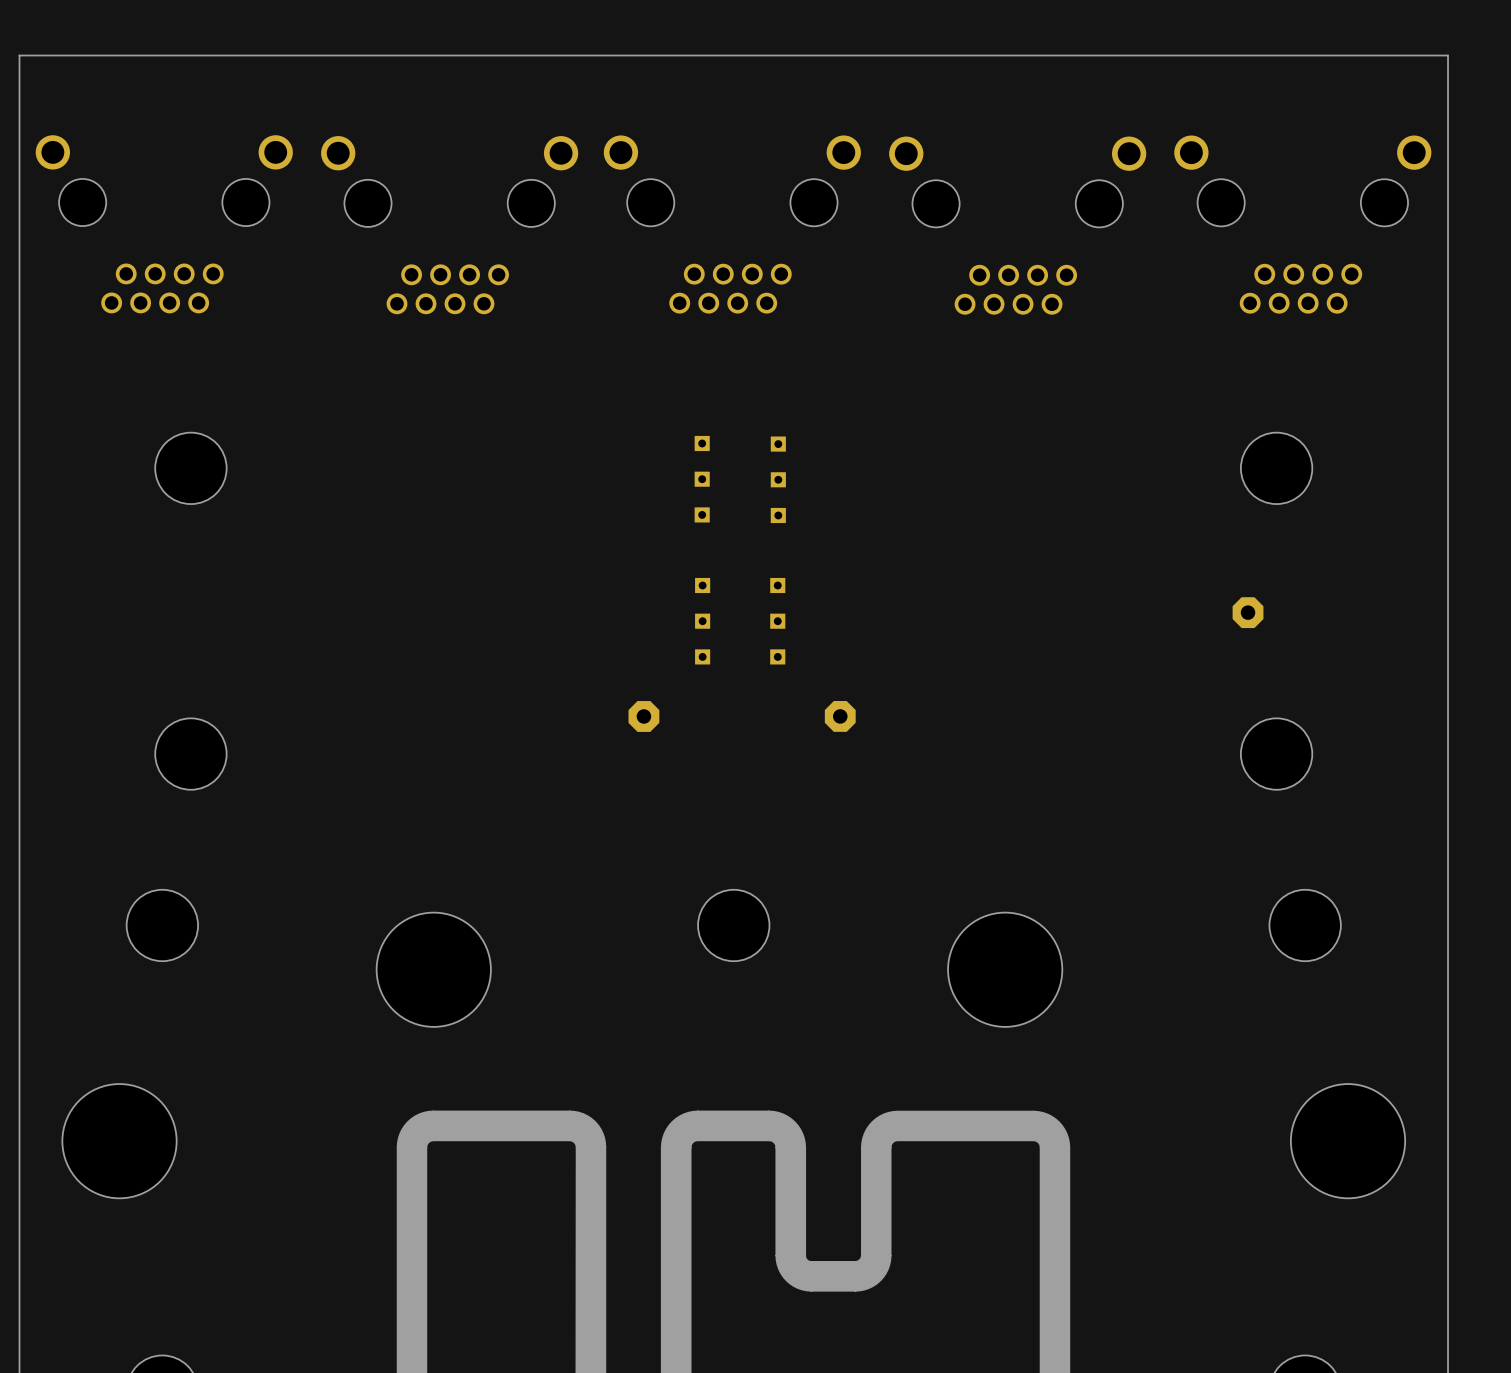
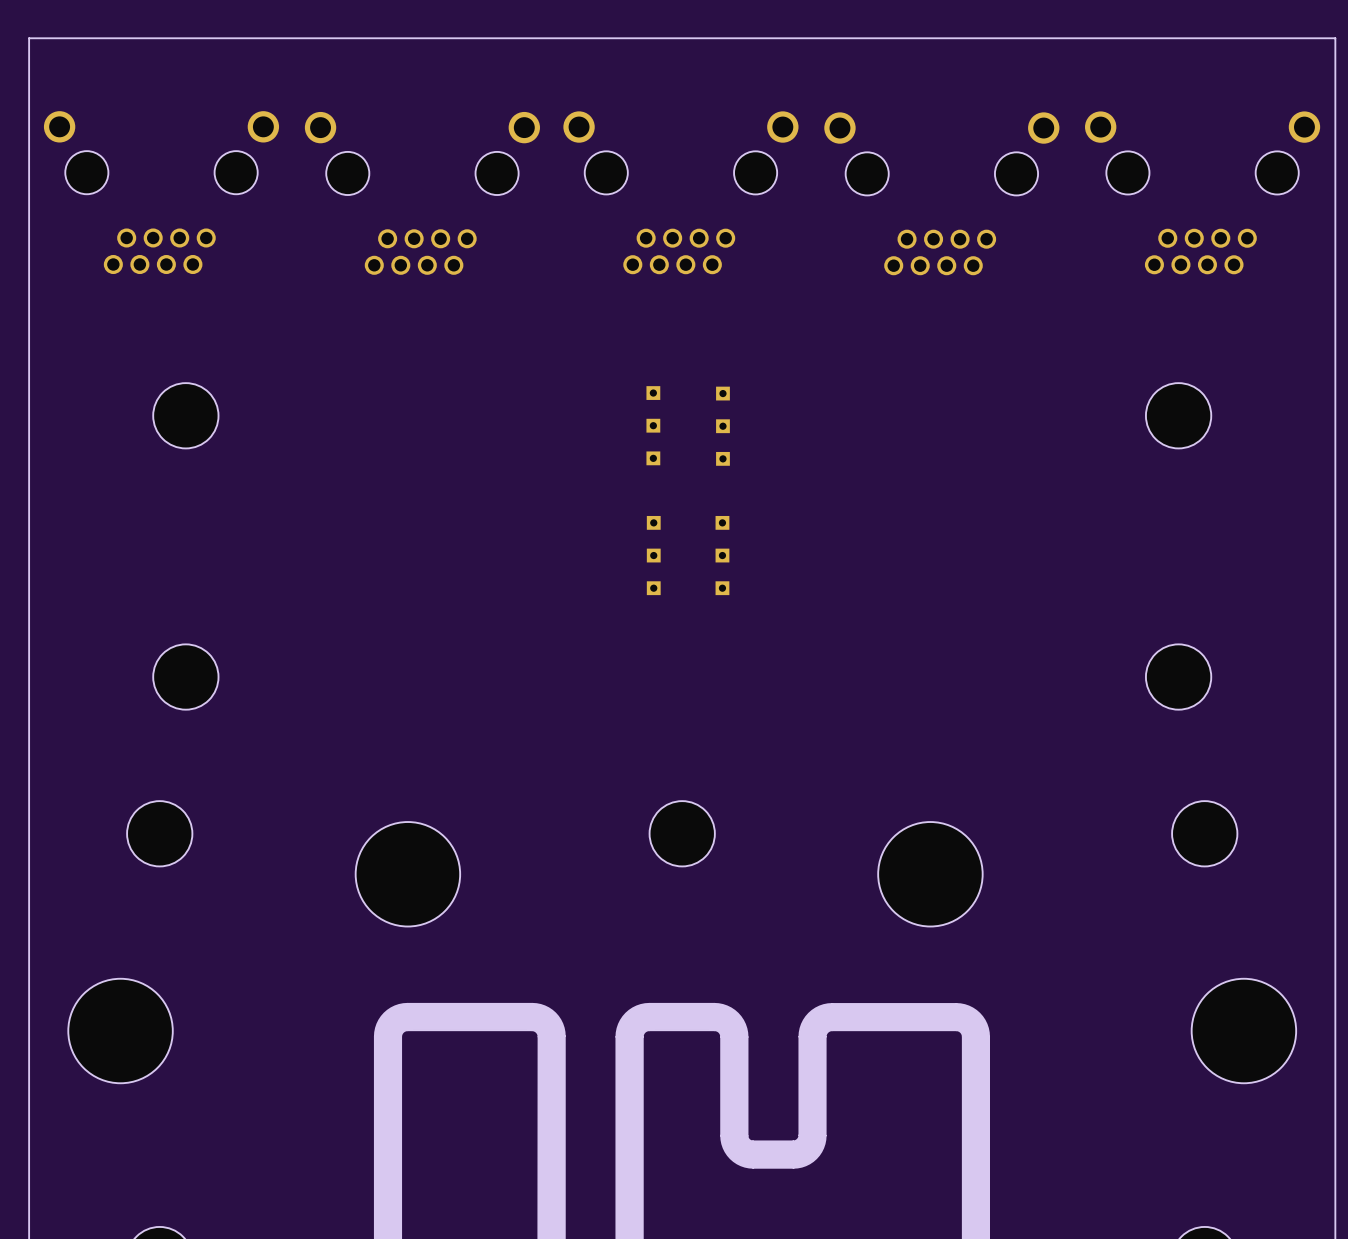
part: (1248, 612) -> none
part: (643, 716) -> none
part: (840, 716) -> none

